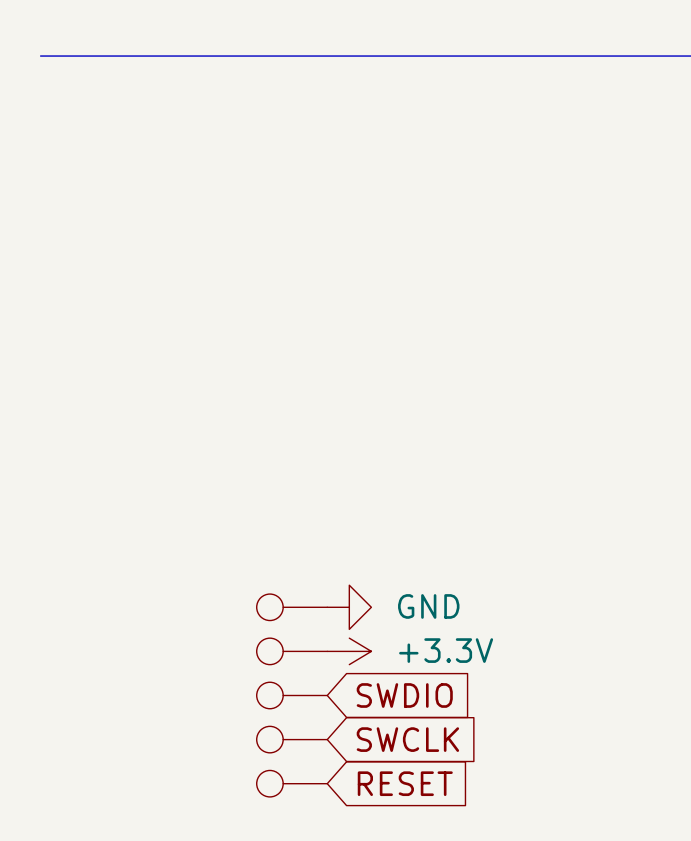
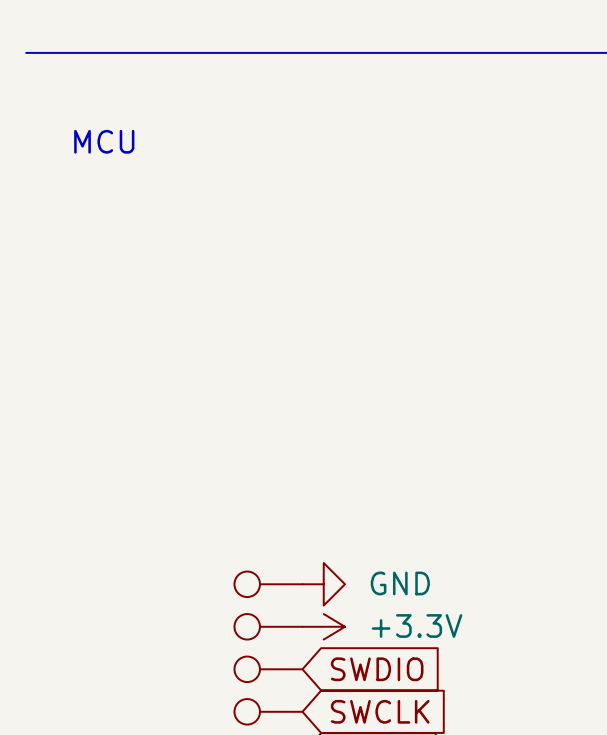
text: none -> MCU (104, 141)

